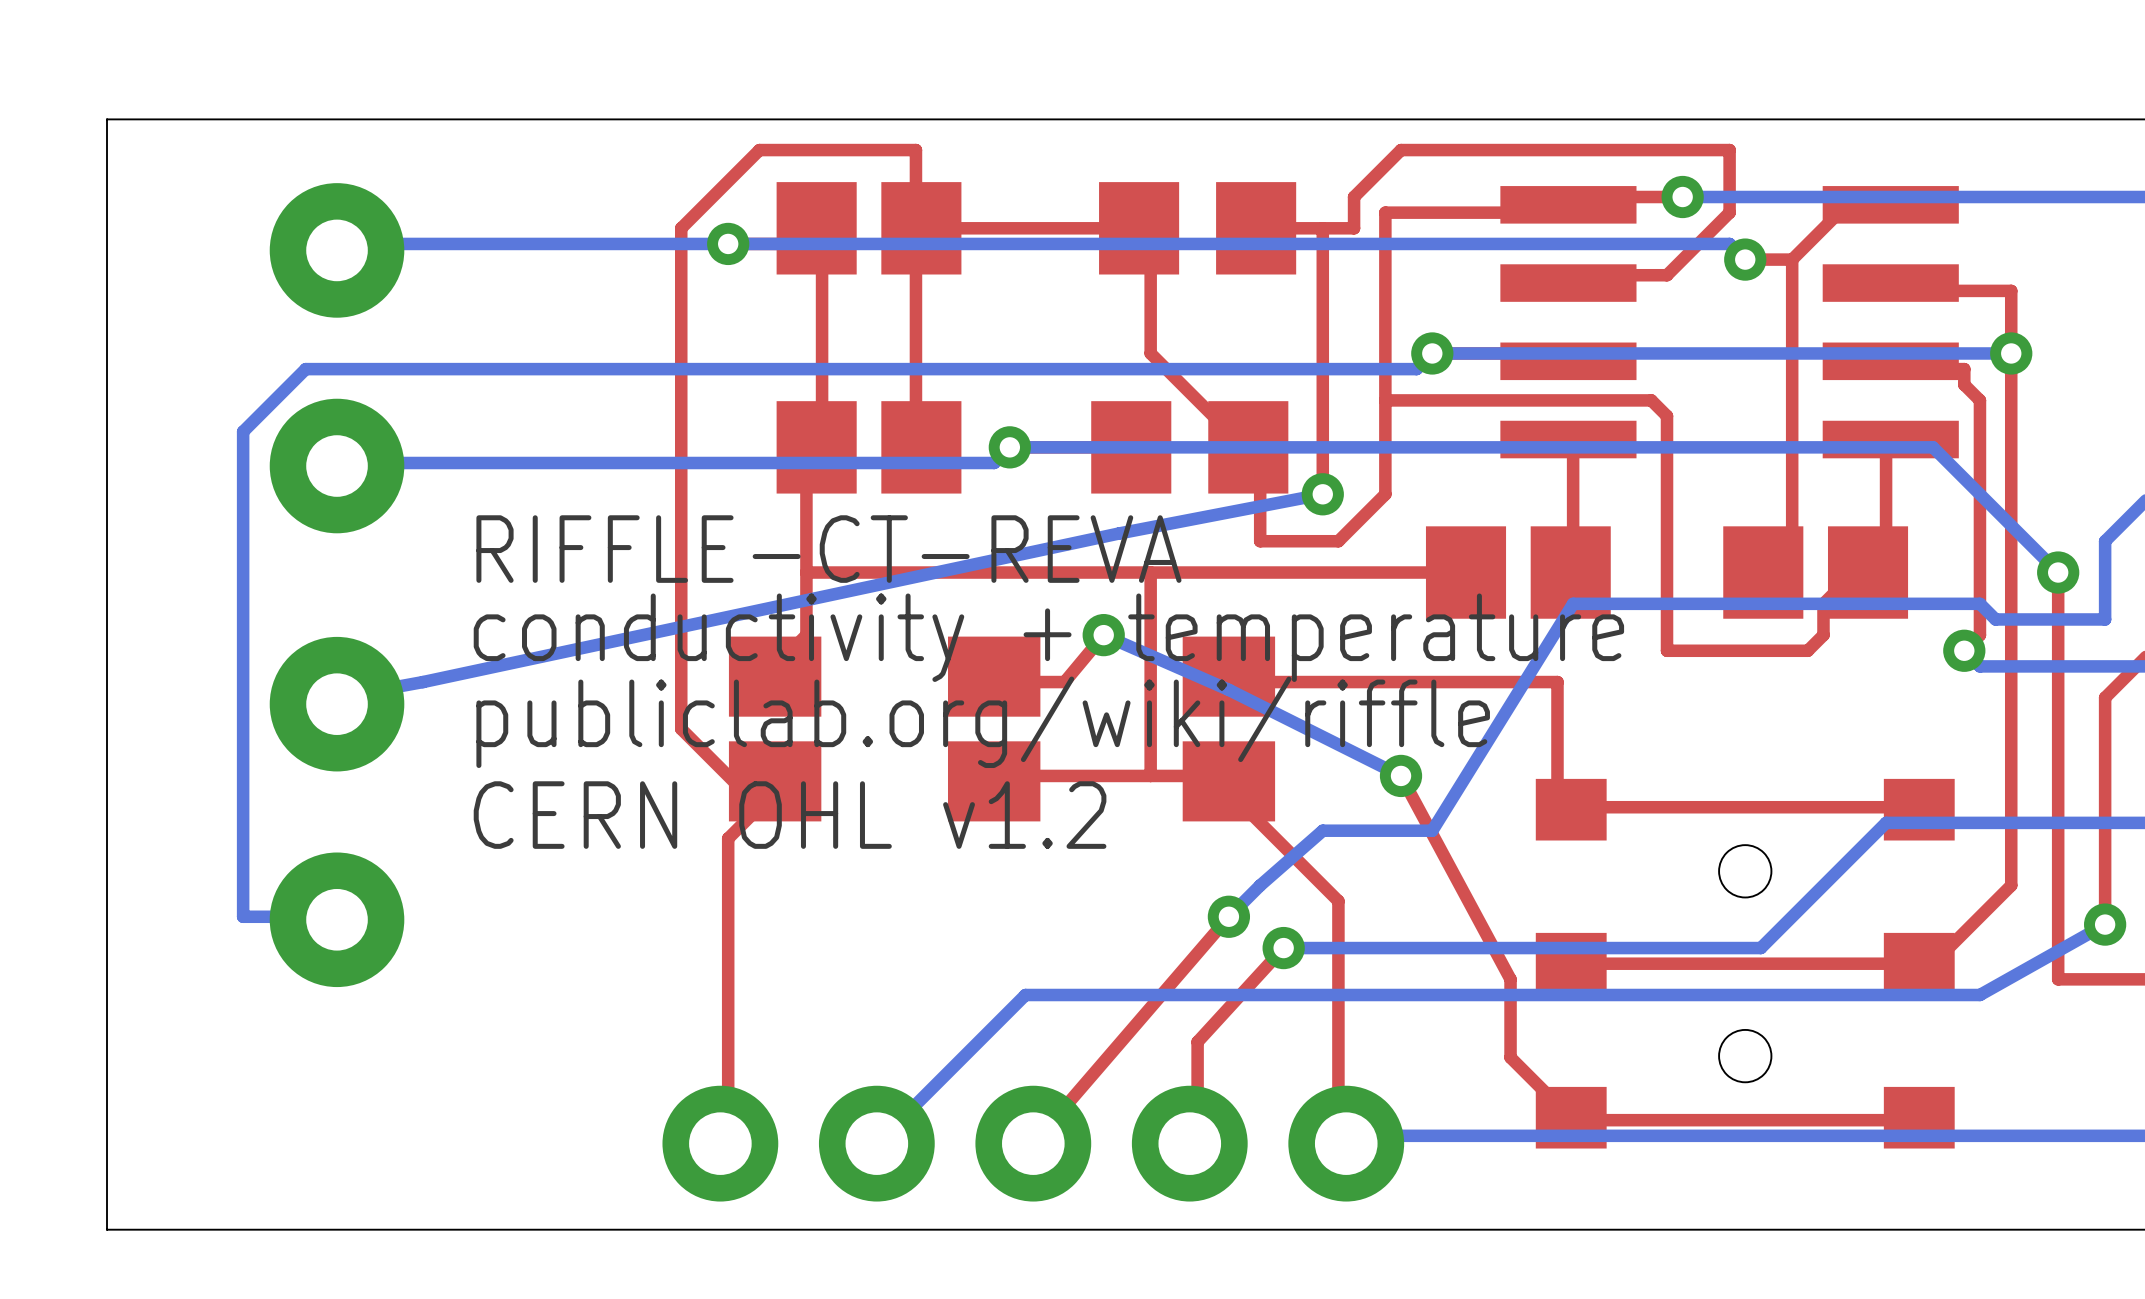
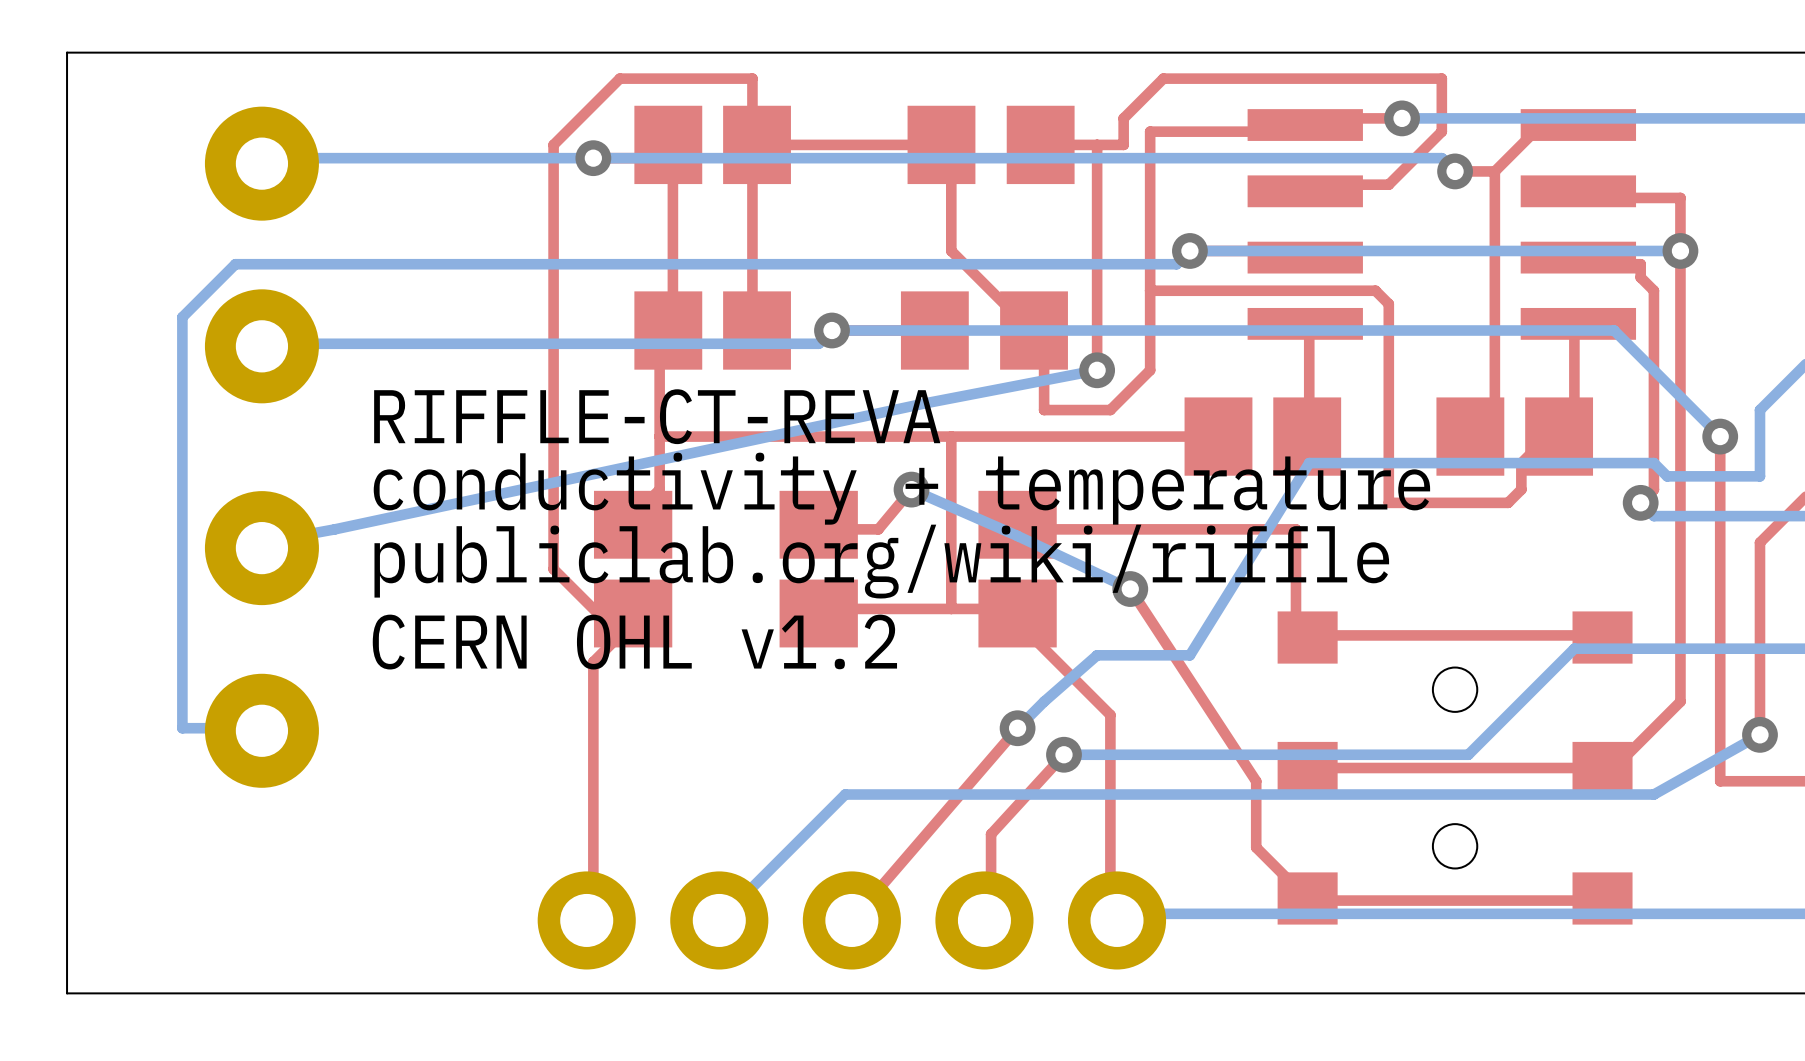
bottom track: (1228, 689) (1401, 775) -> (1017, 536) (1130, 589)
top track: (1401, 775) (1510, 979) -> (1130, 589) (1256, 781)
via position: (1401, 775) -> (1130, 589)

